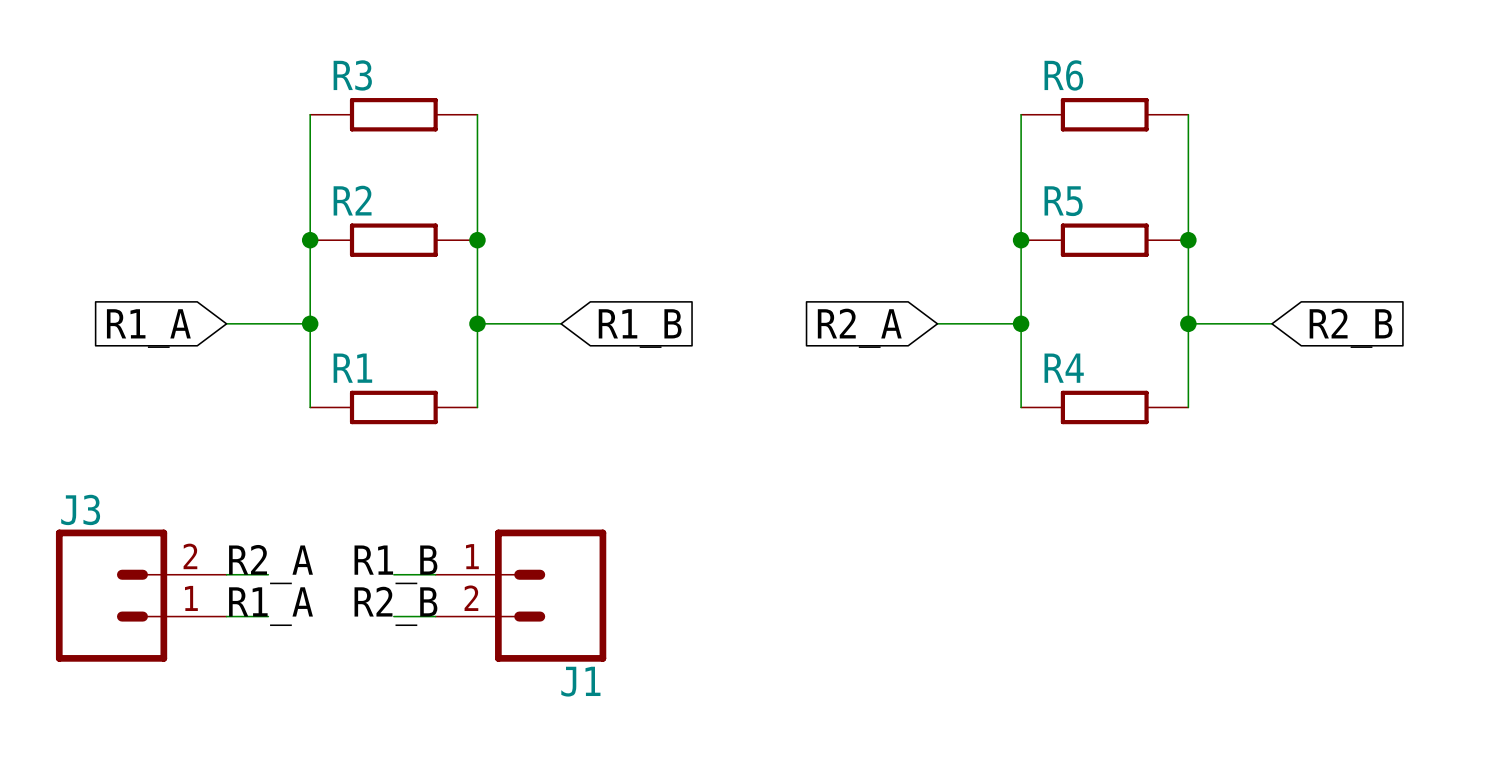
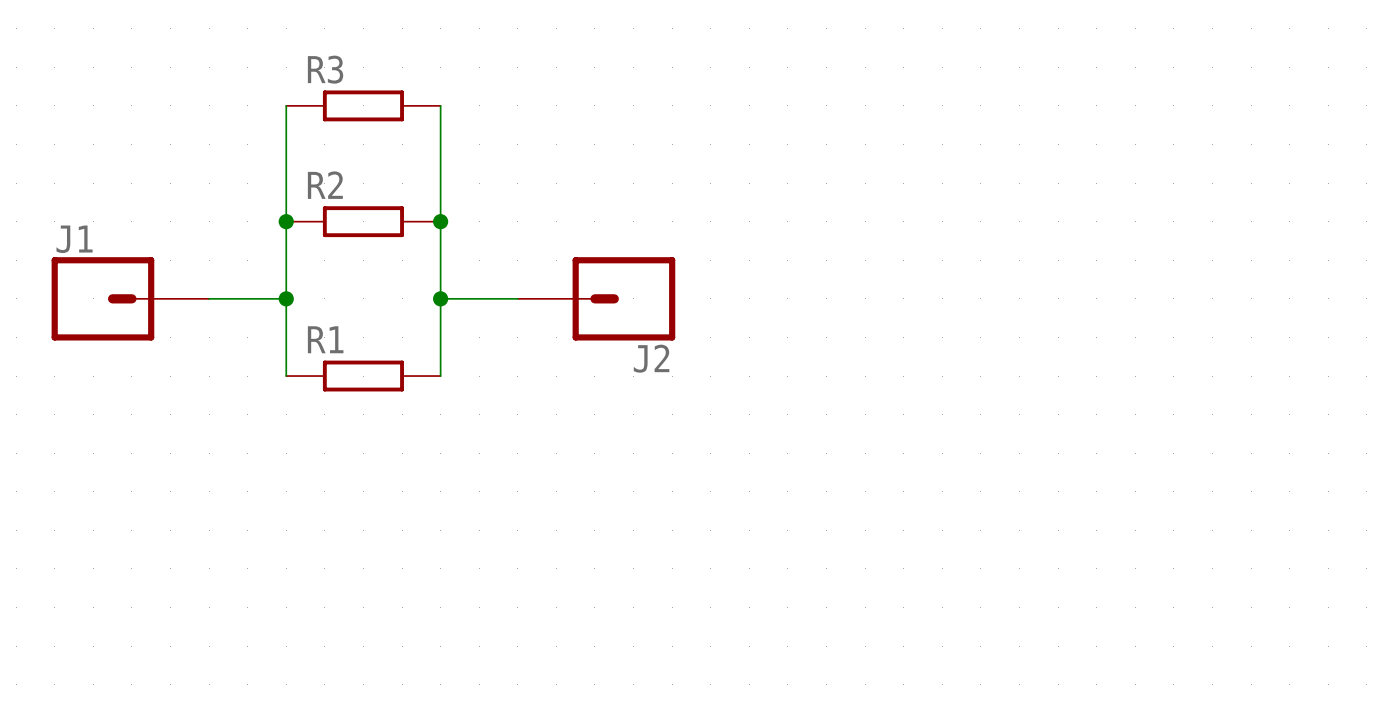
wire: (1021, 114) (1021, 407) -> none
R6: (1104, 114) -> none
wire: (1188, 114) (1188, 407) -> none
junction: (1021, 240) -> none
R5: (1104, 240) -> none
junction: (1188, 240) -> none
J2: none -> (596, 298)
wire: (937, 323) (1021, 323) -> none
junction: (1021, 323) -> none
wire: (1188, 323) (1272, 323) -> none
junction: (1188, 323) -> none
global label: R1_A (148, 328) -> none
global label: R1_B (640, 328) -> none
global label: R2_A (859, 328) -> none
global label: R2_B (1351, 328) -> none
R4: (1104, 407) -> none
J1 symbol: [435, 529, 607, 662] -> [51, 257, 210, 341]
label: R2_A (271, 564) -> none
label: R1_B (395, 564) -> none
wire: (226, 574) (268, 574) -> none
wire: (393, 574) (435, 574) -> none
J3: (141, 595) -> none
label: R1_A (271, 606) -> none
label: R2_B (395, 606) -> none
wire: (226, 616) (268, 616) -> none
wire: (393, 616) (435, 616) -> none
J1 name position: J1 (580, 681) -> J1 (74, 239)

